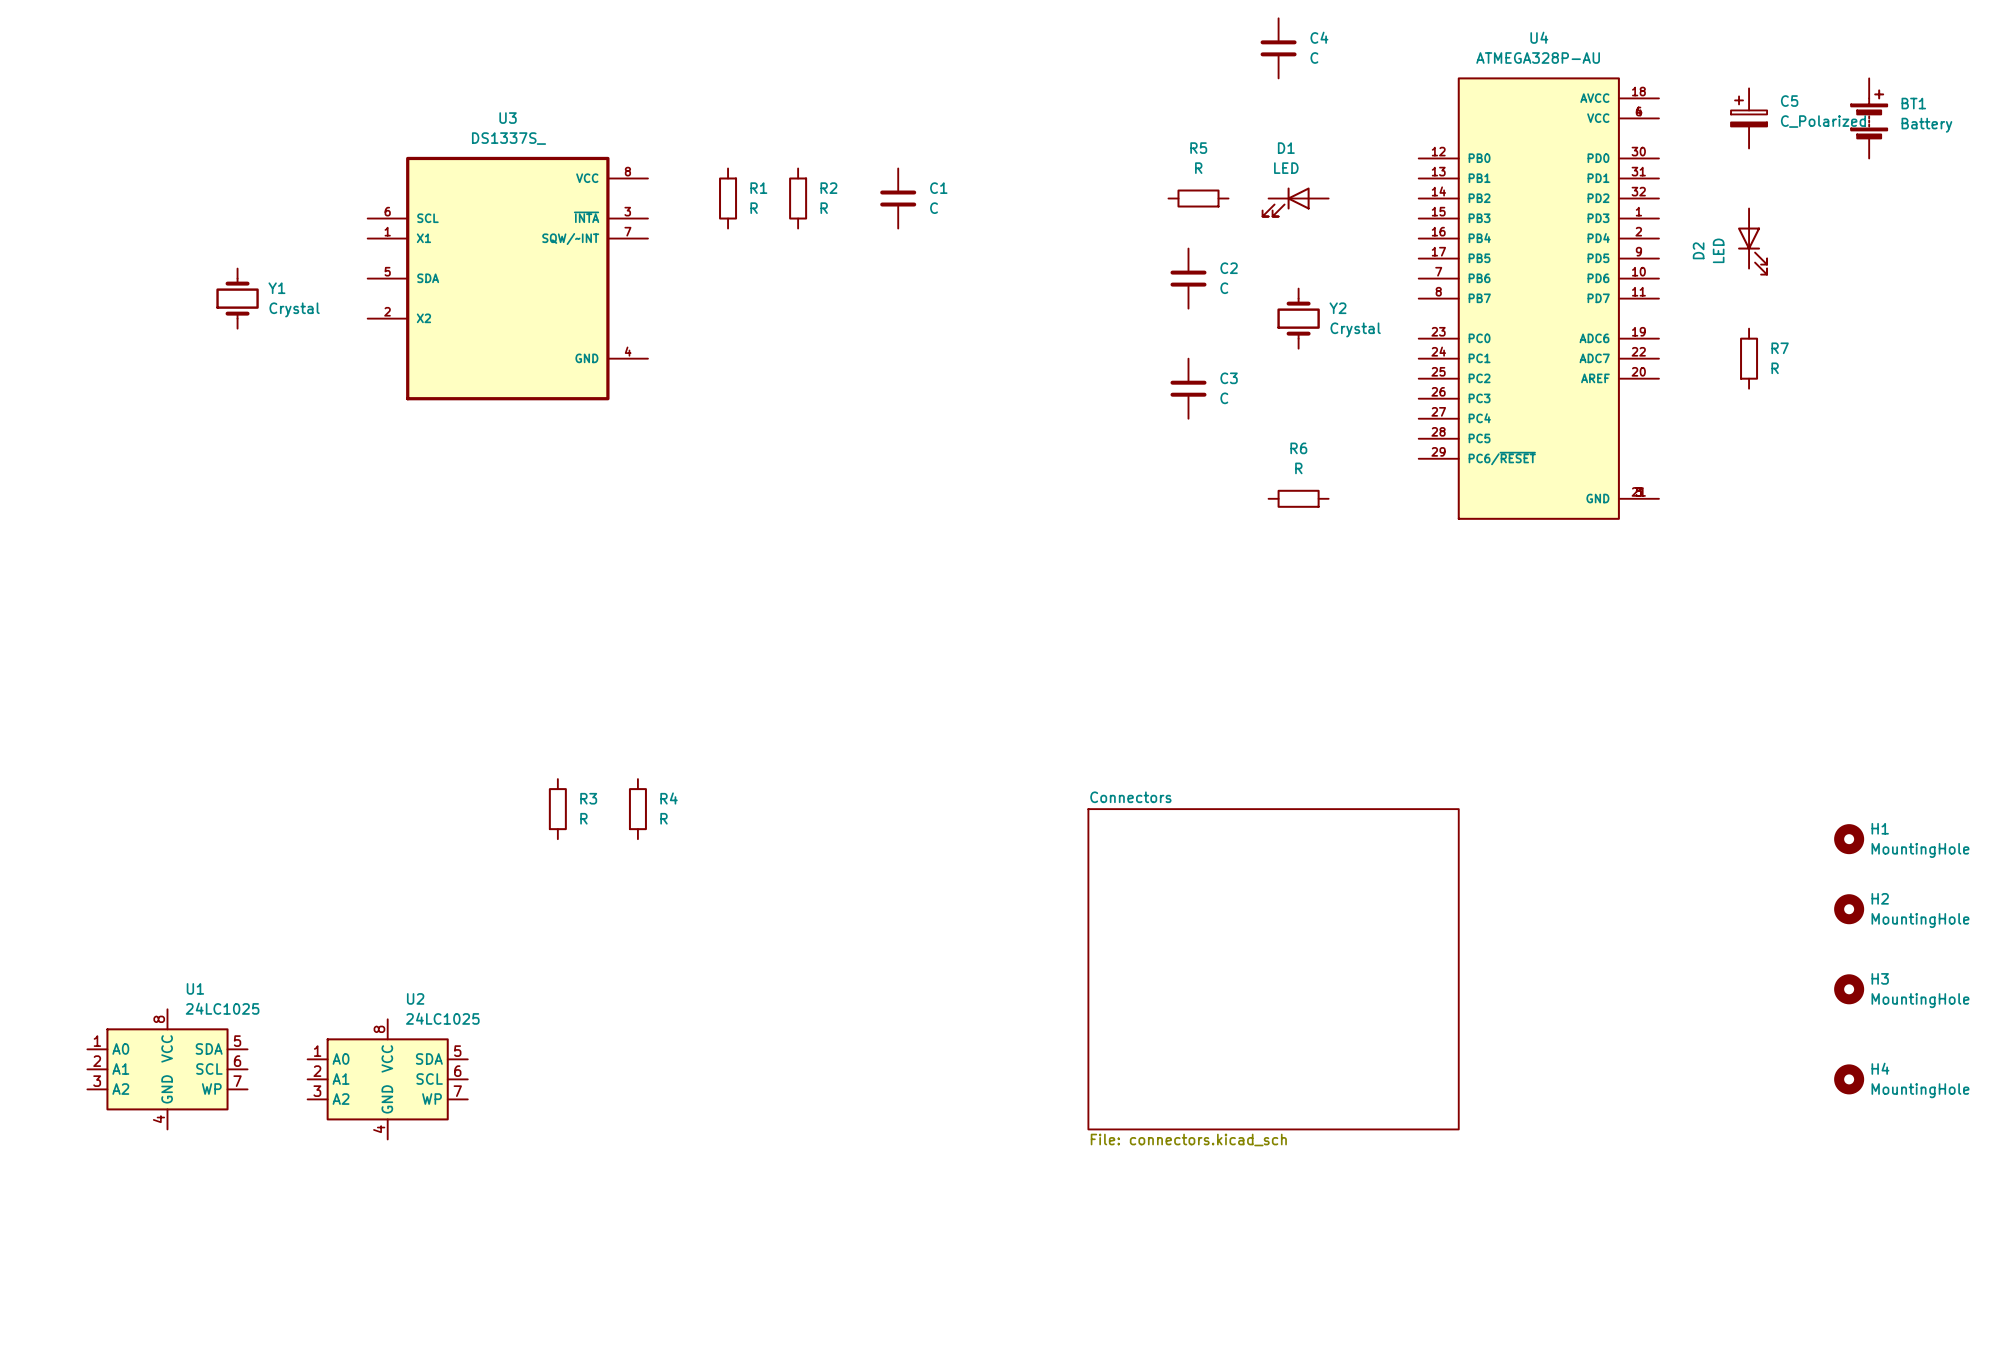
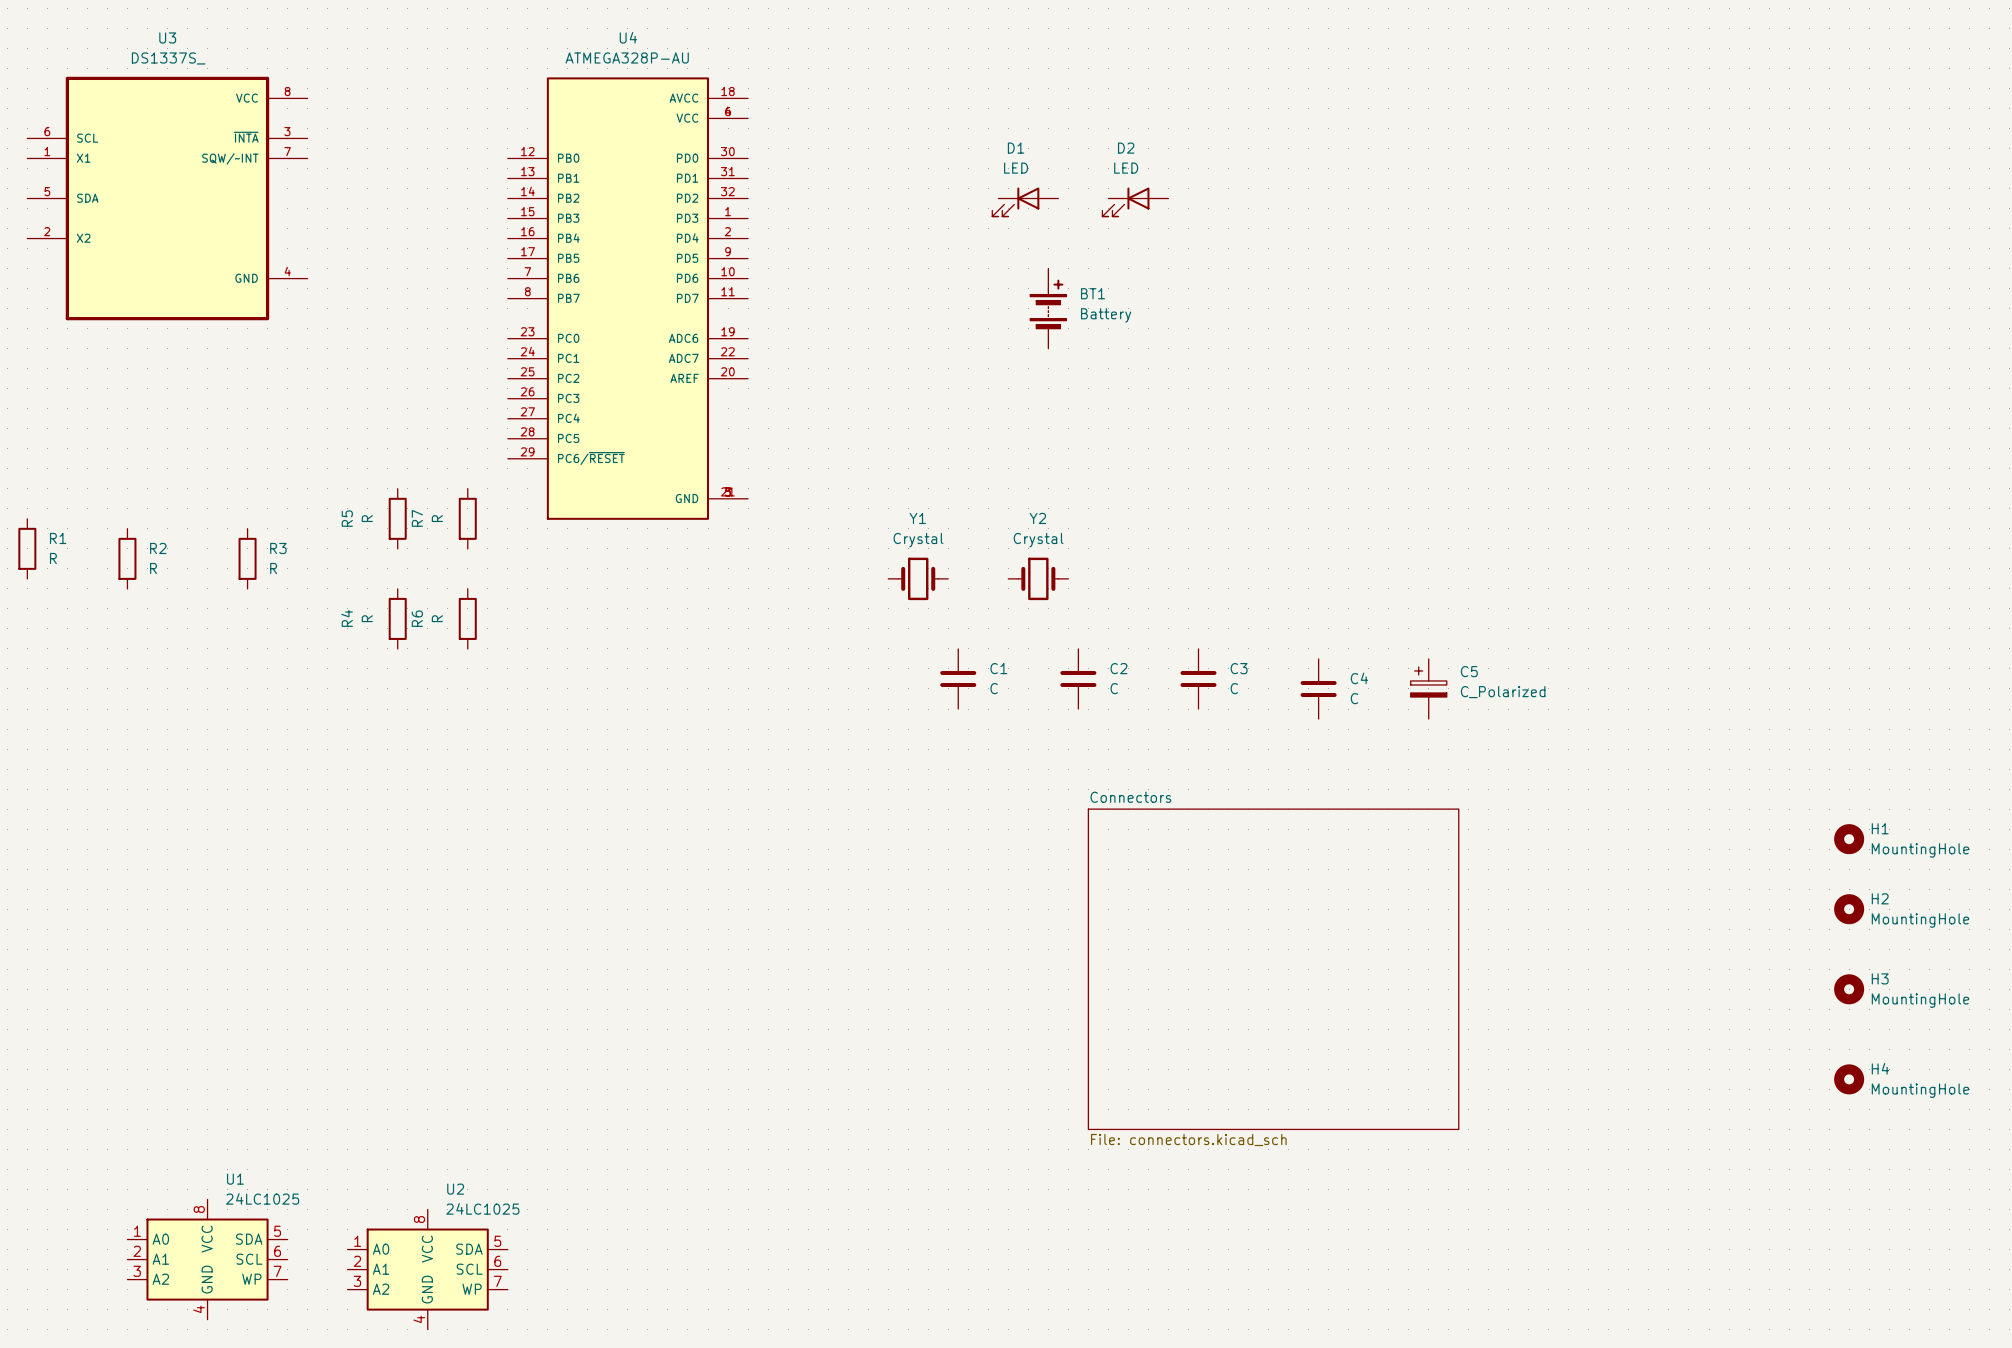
C4 position: (1278, 48) -> (1318, 688)
C5 position: (1749, 118) -> (1428, 688)
BT1 position: (1869, 118) -> (1048, 308)
R5 name position: R5 (1198, 148) -> R5 (347, 518)
R5 value position: R (1198, 168) -> R (367, 518)
R1 position: (728, 198) -> (27, 548)
R2 position: (798, 198) -> (127, 558)
C1 position: (898, 198) -> (958, 678)
R5 rotation: 0° (1198, 198) -> 90° clockwise (397, 518)
R5 position: (1198, 198) -> (397, 518)
D1 position: (1295, 202) -> (1025, 202)
D2 position: (1752, 241) -> (1135, 202)
D2 rotation: 0° (1752, 251) -> 90° clockwise (1125, 202)
U3 position: (507, 278) -> (167, 198)
C2 position: (1188, 278) -> (1078, 678)
Y1 name position: Y1 (276, 288) -> Y1 (917, 518)
Y1 rotation: 0° (237, 298) -> 90° clockwise (918, 578)
Y1 position: (237, 298) -> (918, 578)
U4 position: (1538, 298) -> (627, 298)
Y2 name position: Y2 (1338, 308) -> Y2 (1037, 518)
Y1 value position: Crystal (294, 309) -> Crystal (918, 540)
Y2 rotation: 0° (1298, 318) -> 90° clockwise (1038, 578)
Y2 position: (1298, 318) -> (1038, 578)
Y2 value position: Crystal (1355, 329) -> Crystal (1038, 540)
R7 name rotation: 0° (1780, 348) -> 90° counterclockwise (417, 518)
R7 name position: R7 (1780, 348) -> R7 (417, 518)
R7 position: (1749, 358) -> (467, 518)
R7 value rotation: 0° (1775, 368) -> 90° counterclockwise (437, 518)
R7 value position: R (1775, 368) -> R (437, 518)
C3 position: (1188, 388) -> (1198, 678)
R6 name position: R6 (1298, 448) -> R6 (417, 618)
R6 value position: R (1298, 468) -> R (437, 618)
R6 rotation: 0° (1298, 498) -> 90° clockwise (467, 618)
R6 position: (1298, 498) -> (467, 618)
R4 name rotation: 0° (669, 798) -> 90° counterclockwise (347, 618)
R4 name position: R4 (669, 798) -> R4 (347, 618)
R3 position: (557, 809) -> (247, 558)
R4 position: (637, 809) -> (397, 618)
R4 value rotation: 0° (664, 818) -> 90° counterclockwise (367, 618)
R4 value position: R (664, 818) -> R (367, 618)
U1 position: (167, 1069) -> (207, 1259)
U2 position: (387, 1079) -> (427, 1269)

